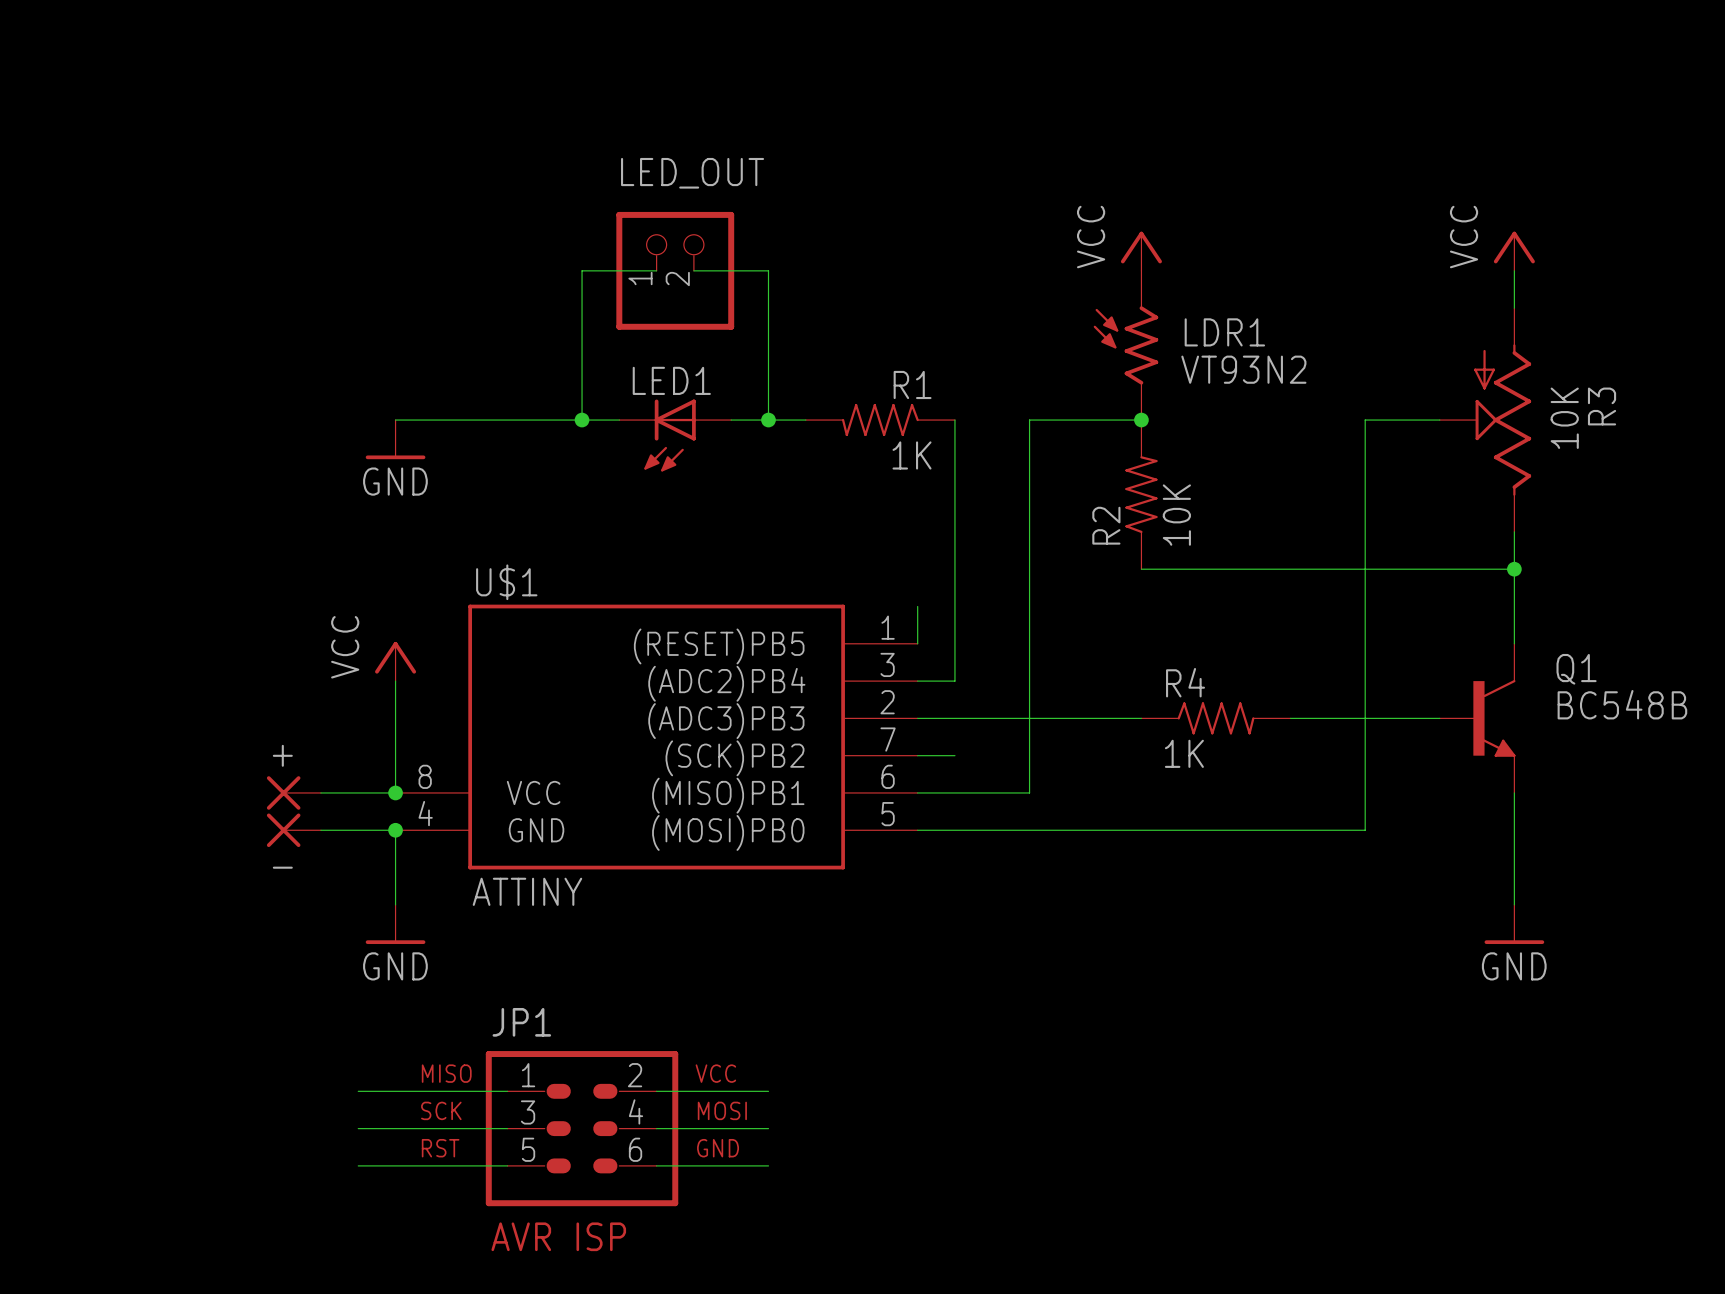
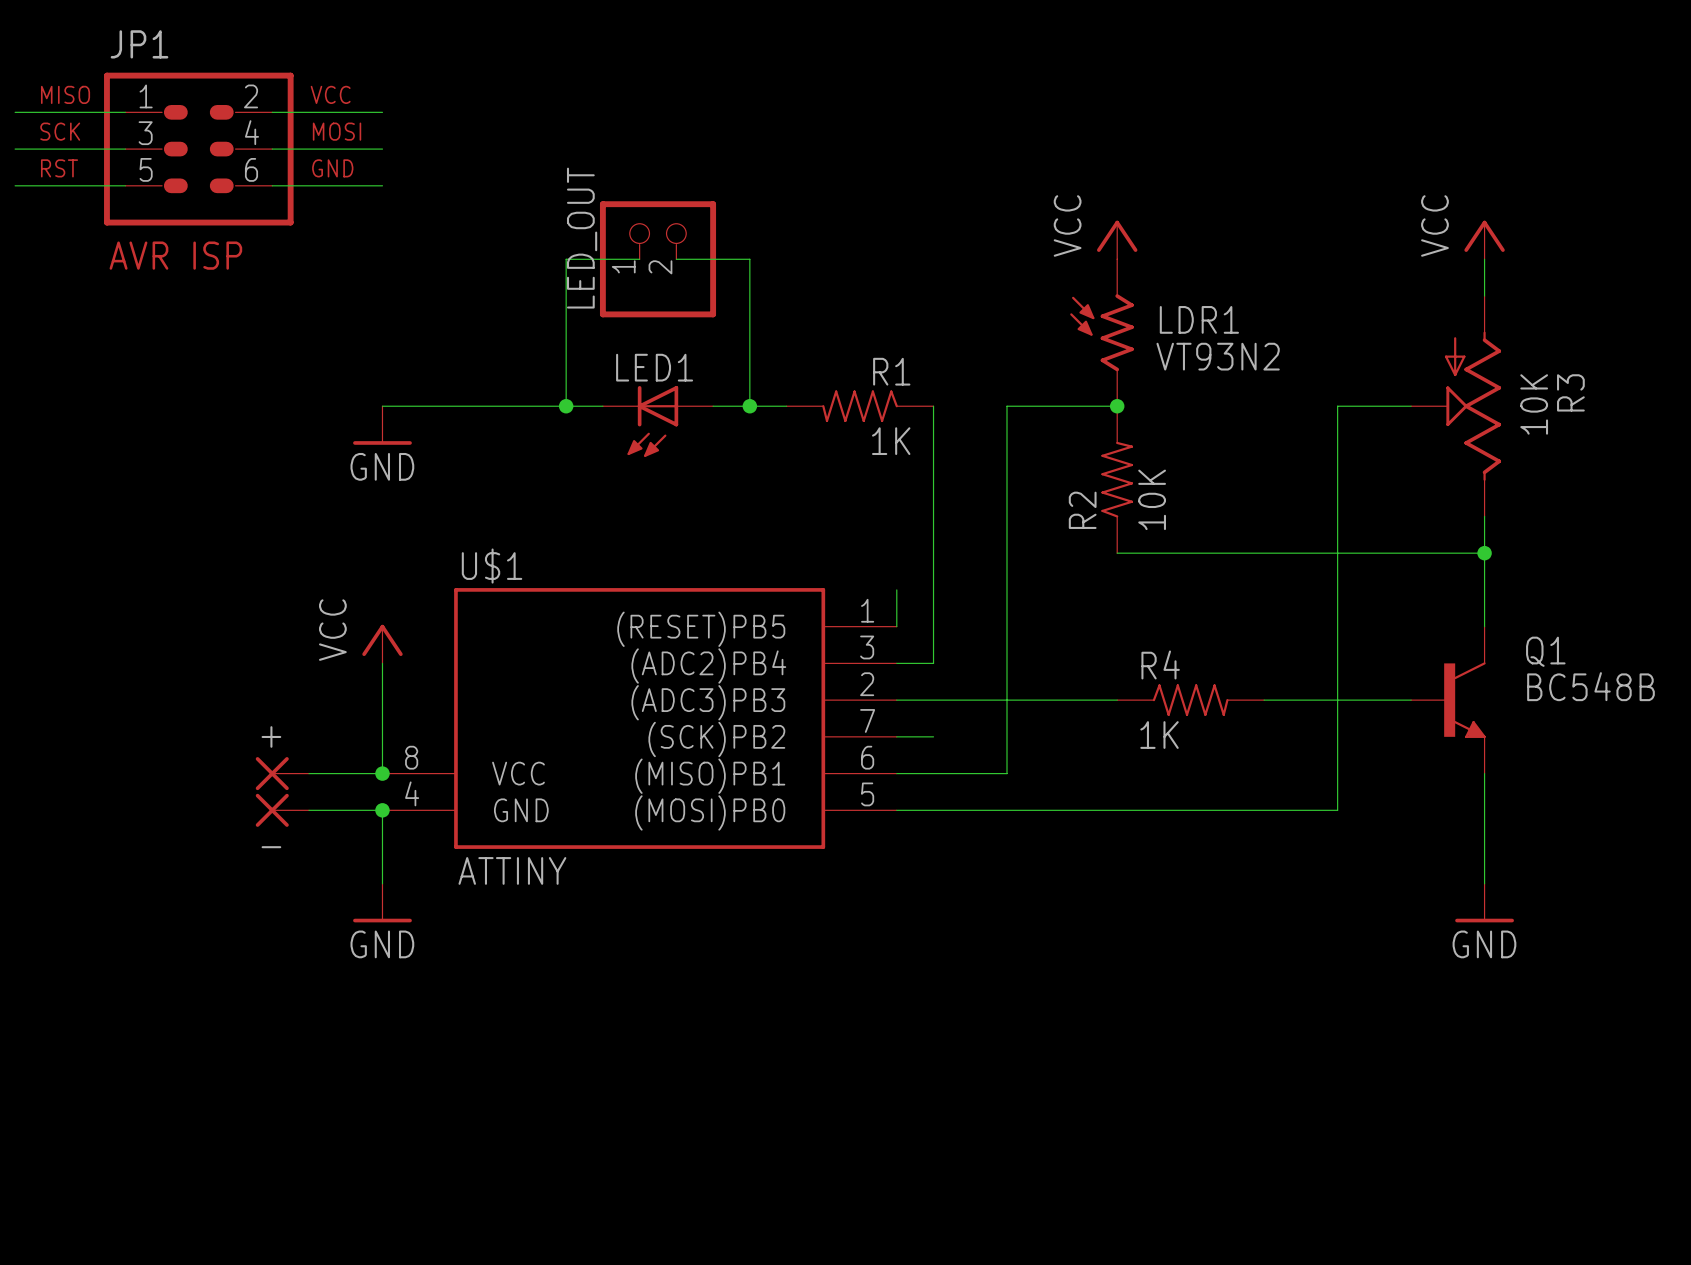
wire: none -> (15, 112) (125, 112)
wire: none -> (272, 112) (382, 112)
wire: none -> (15, 149) (125, 149)
wire: none -> (272, 149) (382, 149)
LED_OUT name rotation: 0° (692, 173) -> 90° counterclockwise (582, 238)
wire: none -> (15, 185) (125, 185)
wire: none -> (272, 185) (382, 185)
wire: (358, 1091) (507, 1091) -> none
wire: (656, 1091) (768, 1091) -> none
wire: (358, 1128) (507, 1128) -> none
JP1 position: (582, 1128) -> (198, 149)
wire: (656, 1128) (768, 1128) -> none
wire: (358, 1165) (507, 1165) -> none
wire: (656, 1165) (768, 1165) -> none

